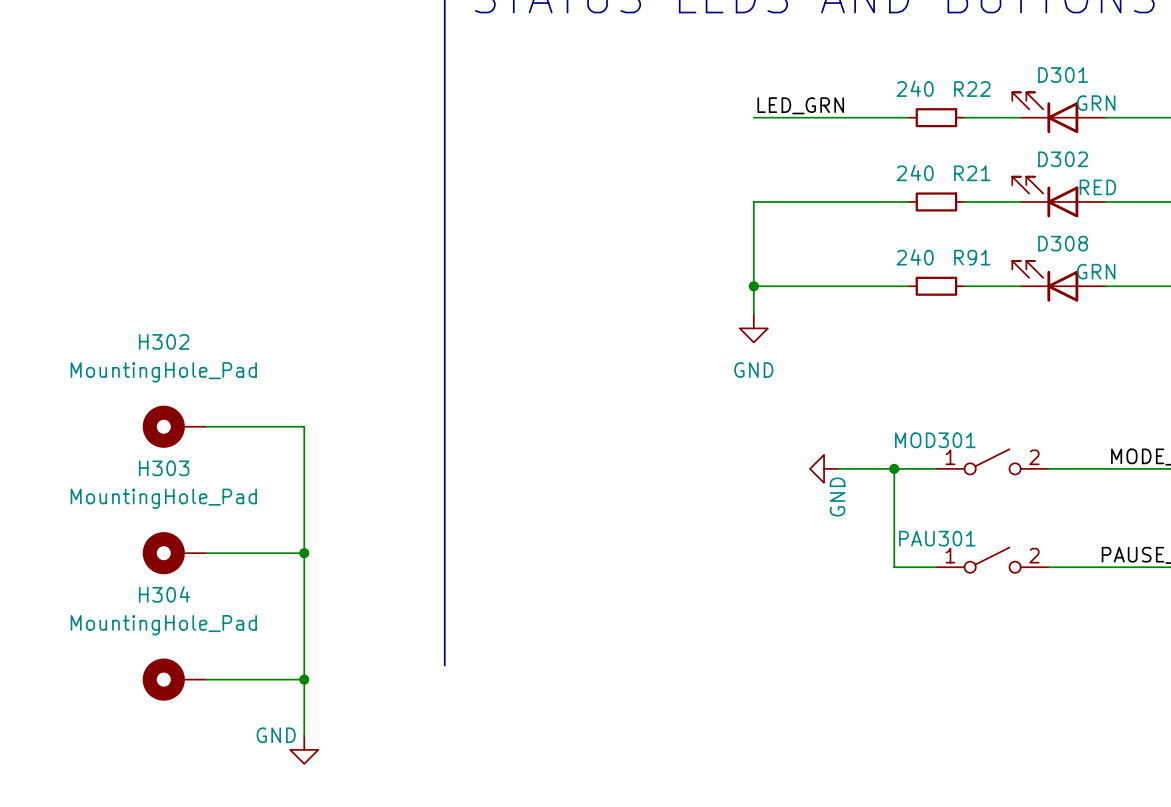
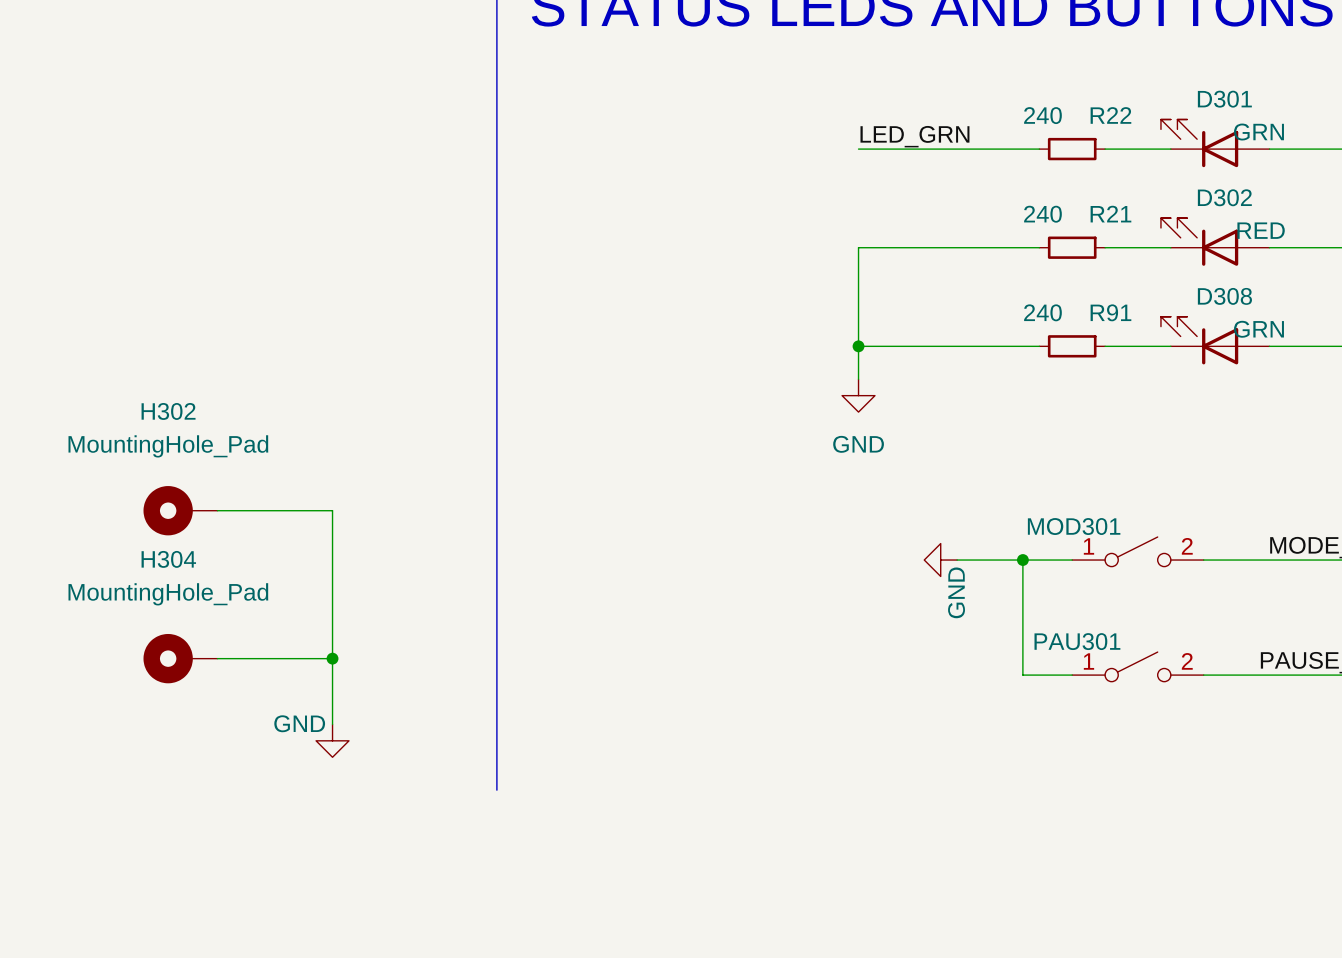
H303 name: H303 (164, 468) -> H304 (168, 559)
wire: (304, 609) (304, 735) -> none
H304: MountingHole_Pad (174, 679) -> none
wire: (205, 679) (304, 679) -> none
junction: (304, 679) -> none
power symbol position: GND (304, 749) -> GND (332, 740)

